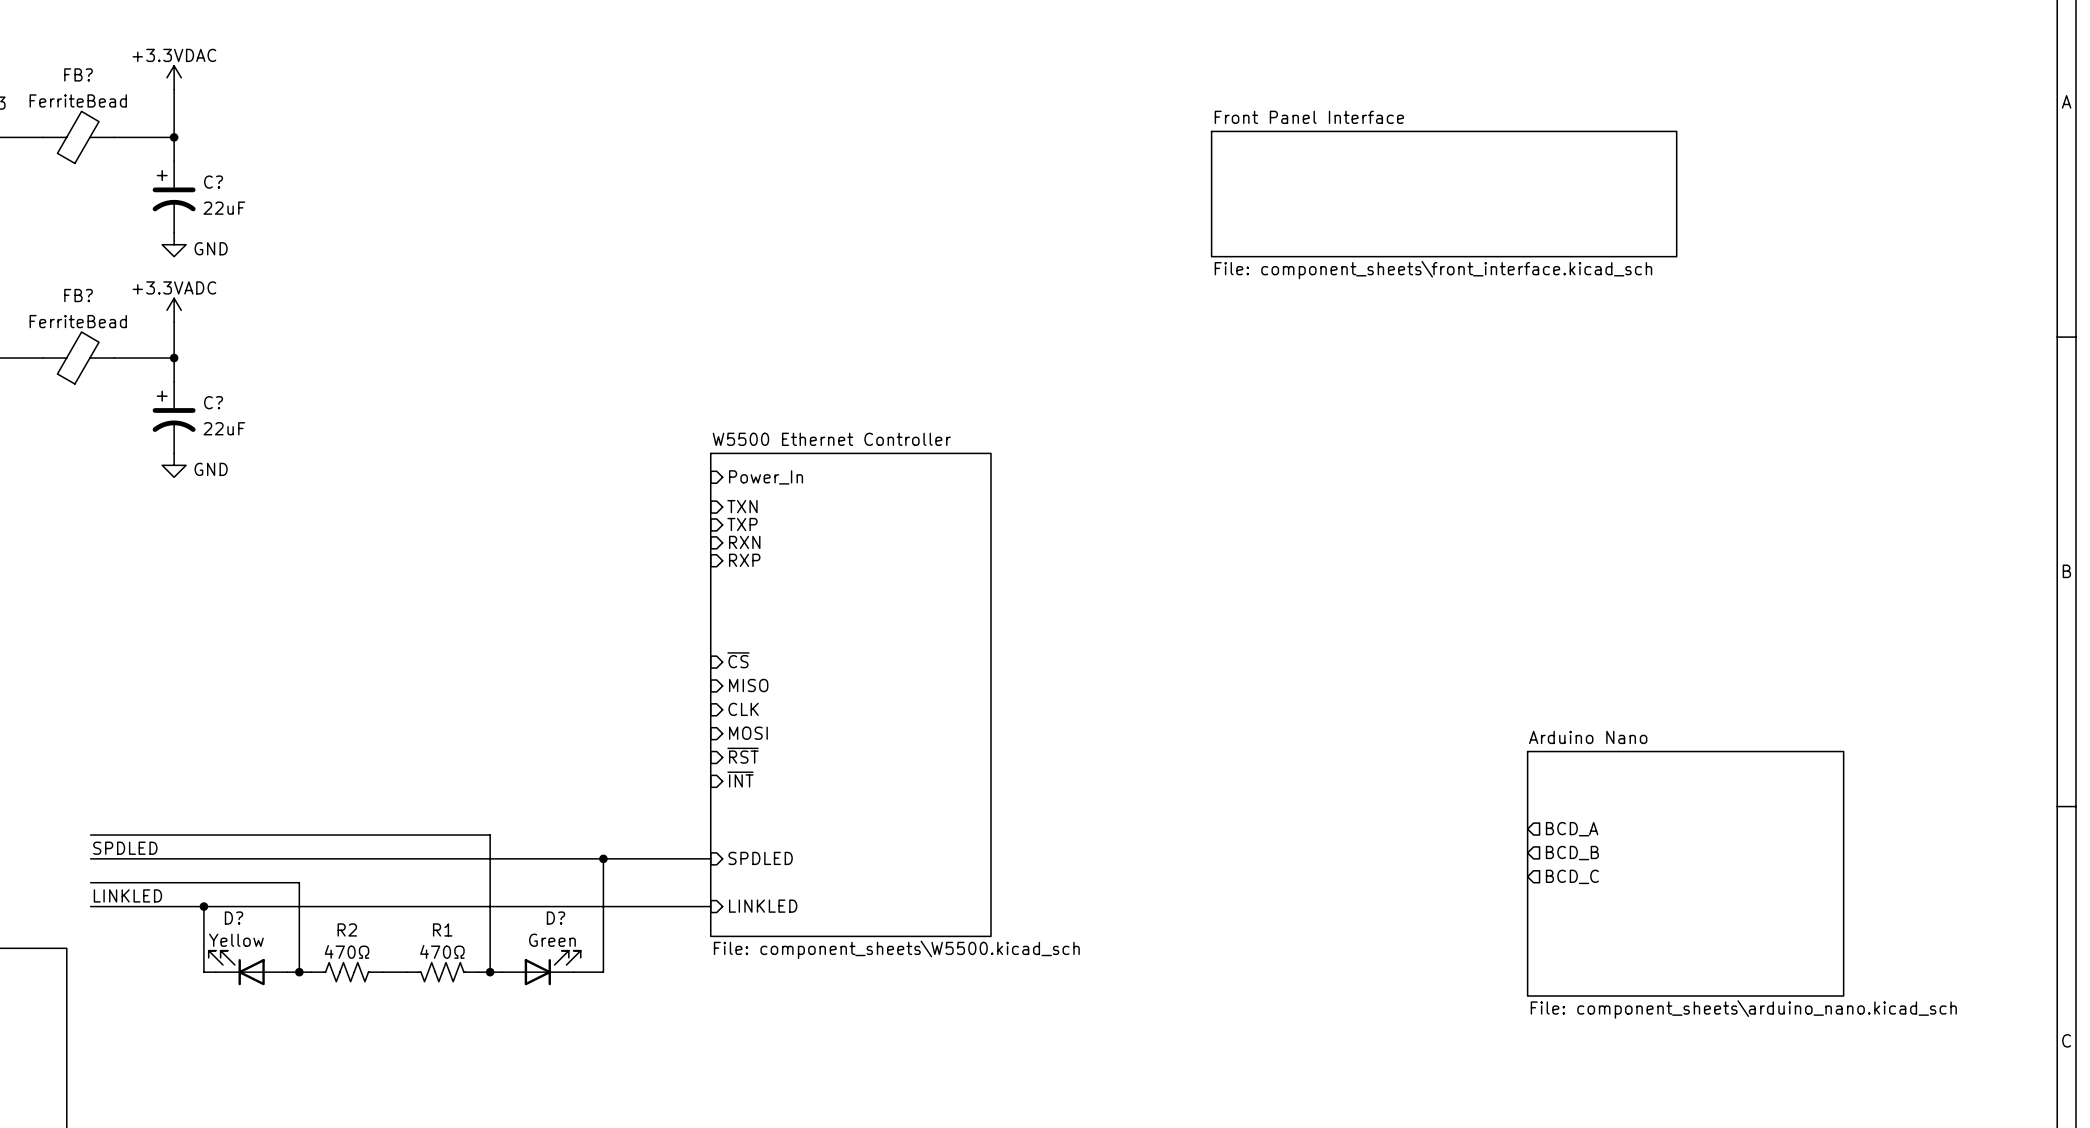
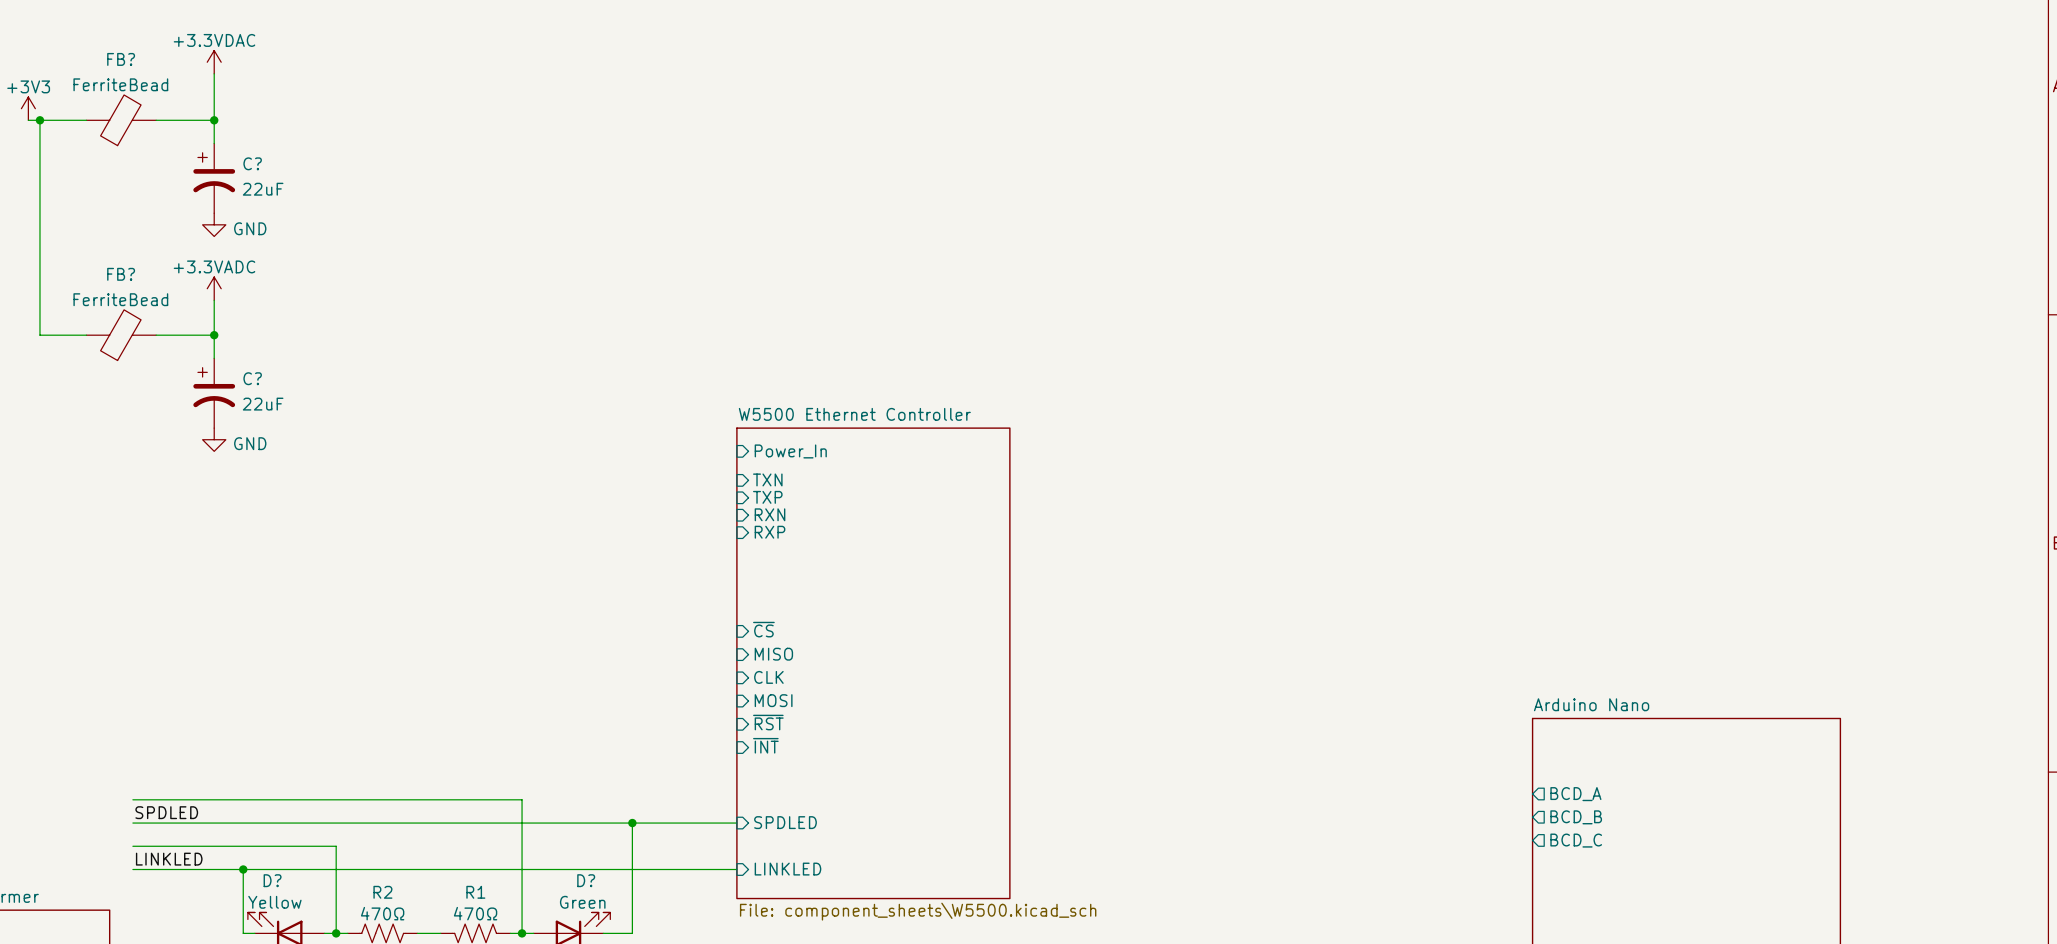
sheet Front Panel Interface: File: component_sheets\front_interface.kicad_sch (1444, 194) -> none

